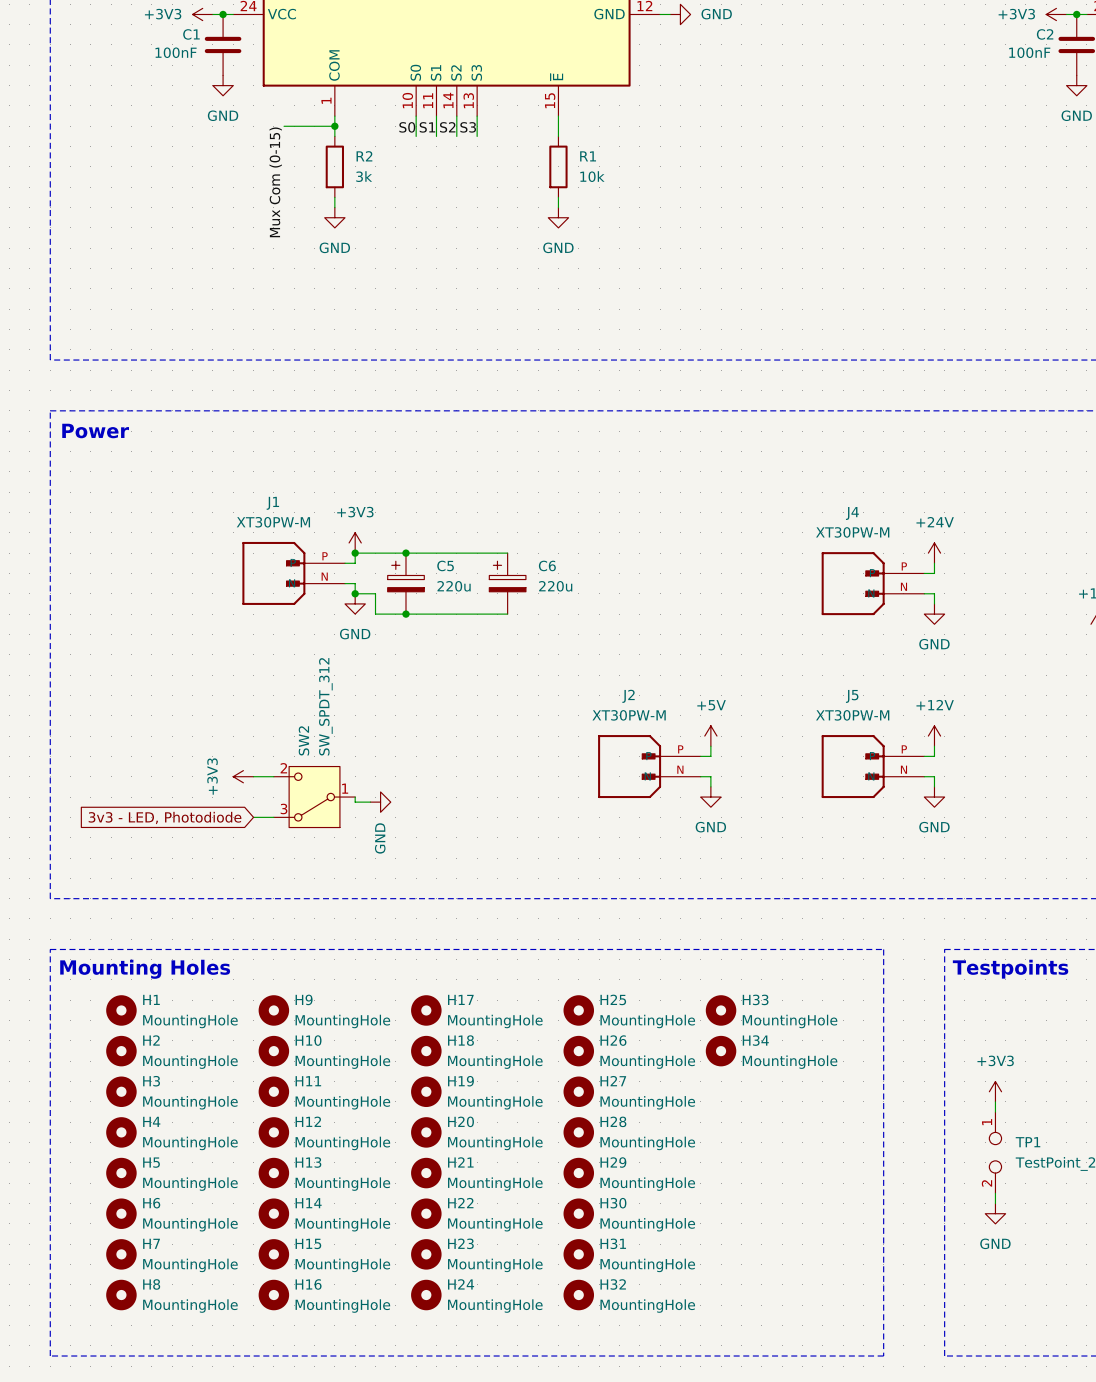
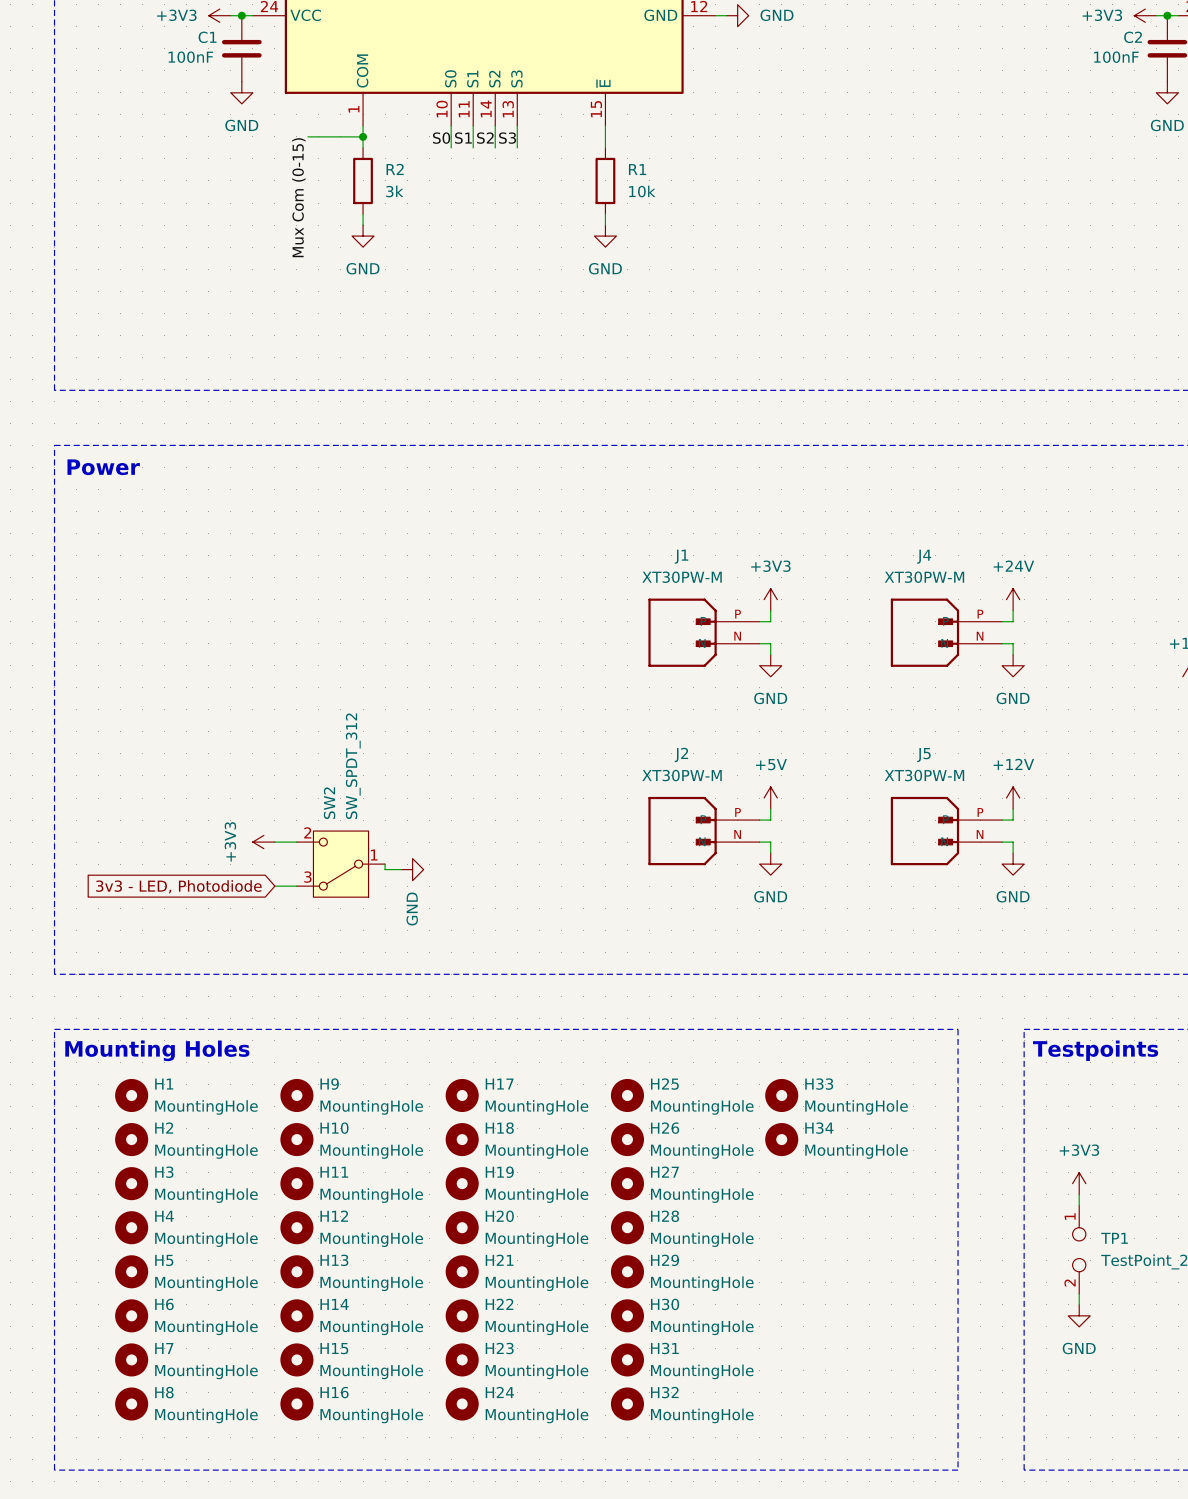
power symbol: +3V3 (355, 542) -> none
junction: (355, 553) -> none
junction: (405, 553) -> none
wire: (507, 553) (355, 553) (355, 563) (345, 563) -> none
power symbol: none -> +3V3 (770, 599)
wire: none -> (770, 610) (770, 621) (759, 621)
J1 position: (293, 573) -> (704, 632)
wire: (345, 583) (355, 583) (355, 593) (375, 593) (375, 614) (507, 614) -> none
C5: 220u (405, 583) -> none
C6: 220u (507, 583) -> none
junction: (355, 593) -> none
wire: none -> (759, 643) (770, 643) (770, 654)
power symbol: GND (355, 603) -> none
junction: (405, 614) -> none
power symbol: none -> GND (770, 665)

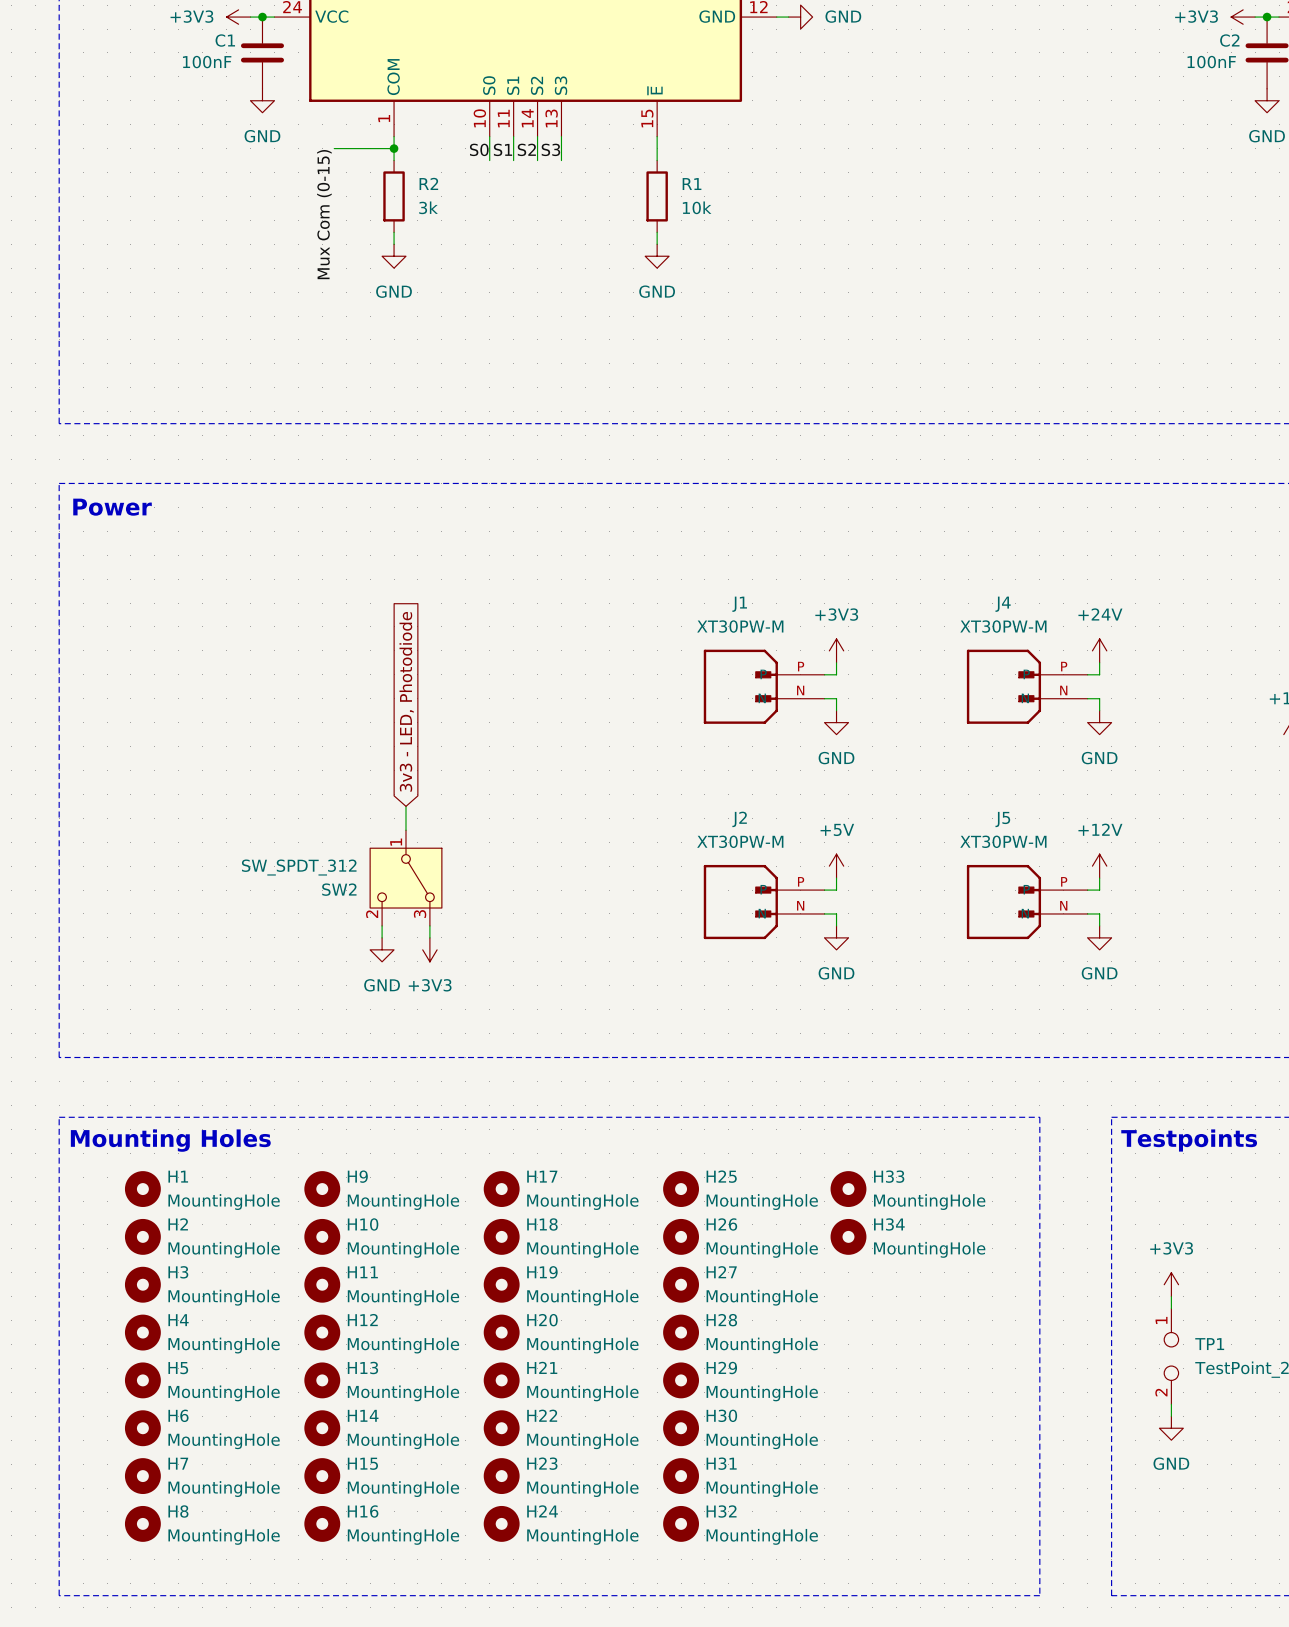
wire: none -> (405, 806) (405, 830)
power symbol rotation: 0° (263, 842) -> 90° counterclockwise (429, 949)
power symbol position: +3V3 (263, 842) -> +3V3 (429, 949)
wire: (274, 842) (296, 842) -> none
wire: none -> (429, 925) (429, 937)
SW2 rotation: 0° (340, 864) -> 90° counterclockwise (405, 878)
SW2 position: (340, 864) -> (405, 878)
wire: (385, 864) (385, 869) (401, 869) -> none
power symbol rotation: 0° (412, 869) -> 90° clockwise (382, 949)
power symbol position: GND (412, 869) -> GND (382, 949)
global label rotation: 0° (178, 886) -> 90° clockwise (406, 701)
global label position: 3v3 - LED, Photodiode (178, 886) -> 3v3 - LED, Photodiode (406, 701)
wire: (274, 886) (296, 886) -> none

